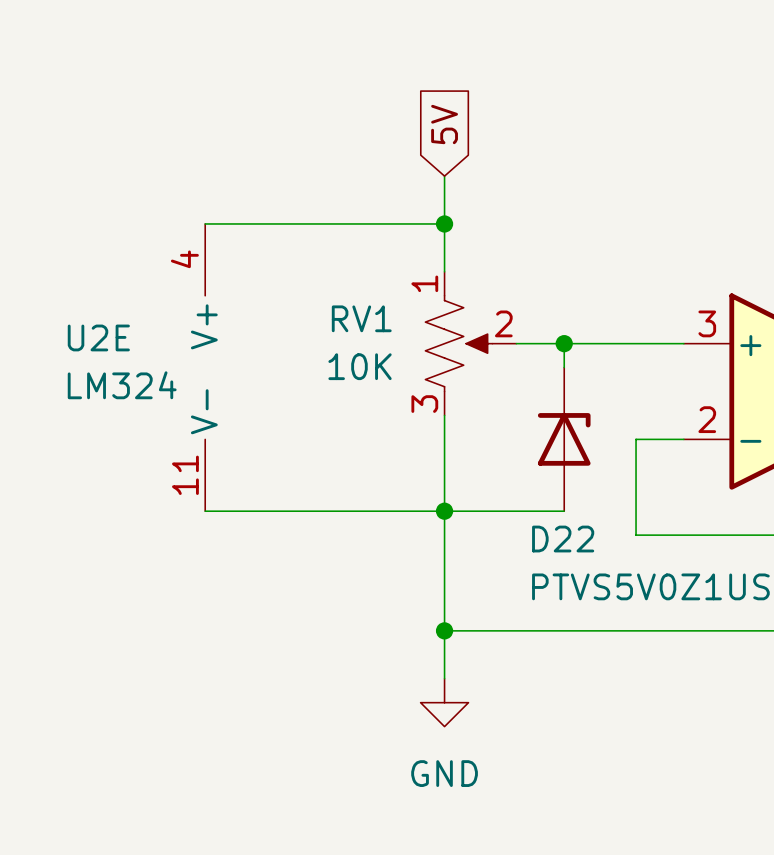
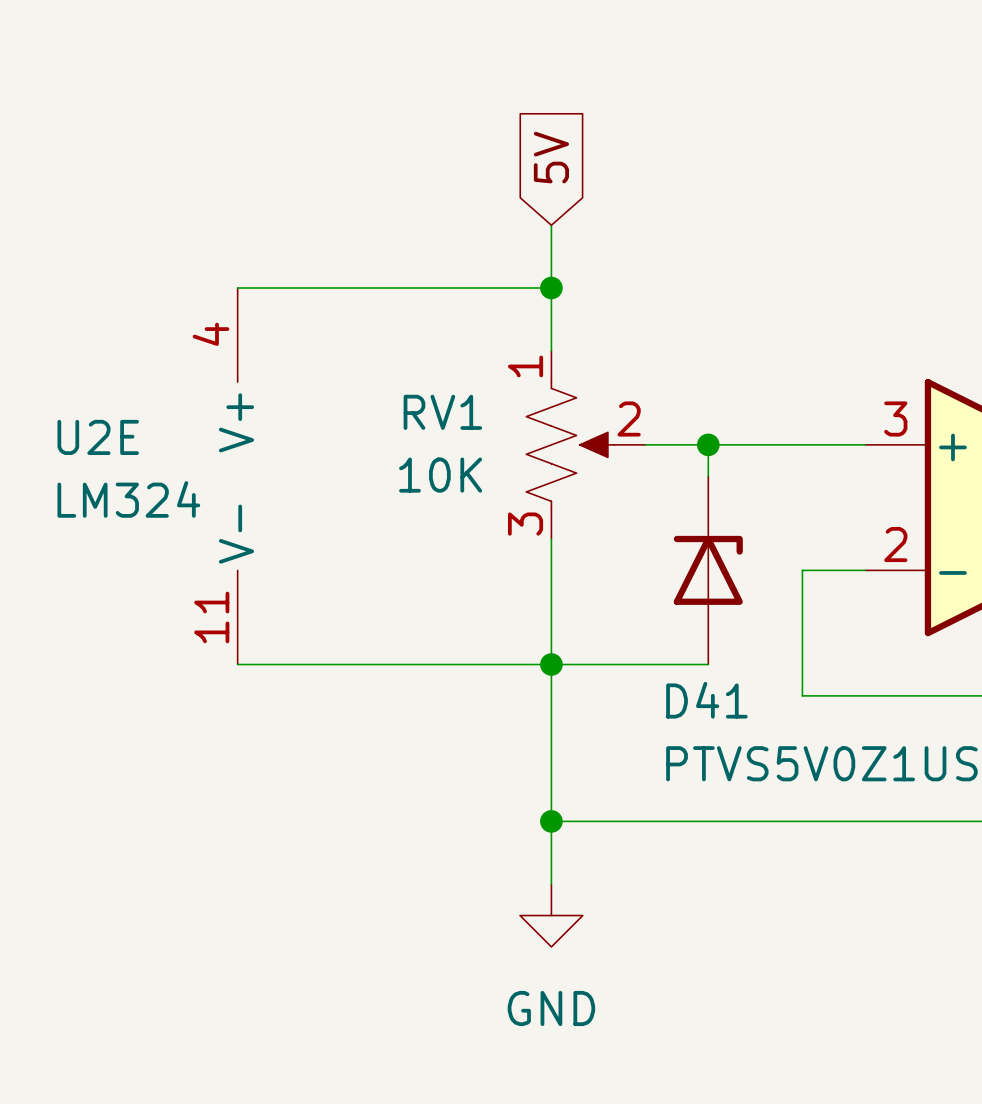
D22 name: D22 (563, 539) -> D41 (706, 700)

